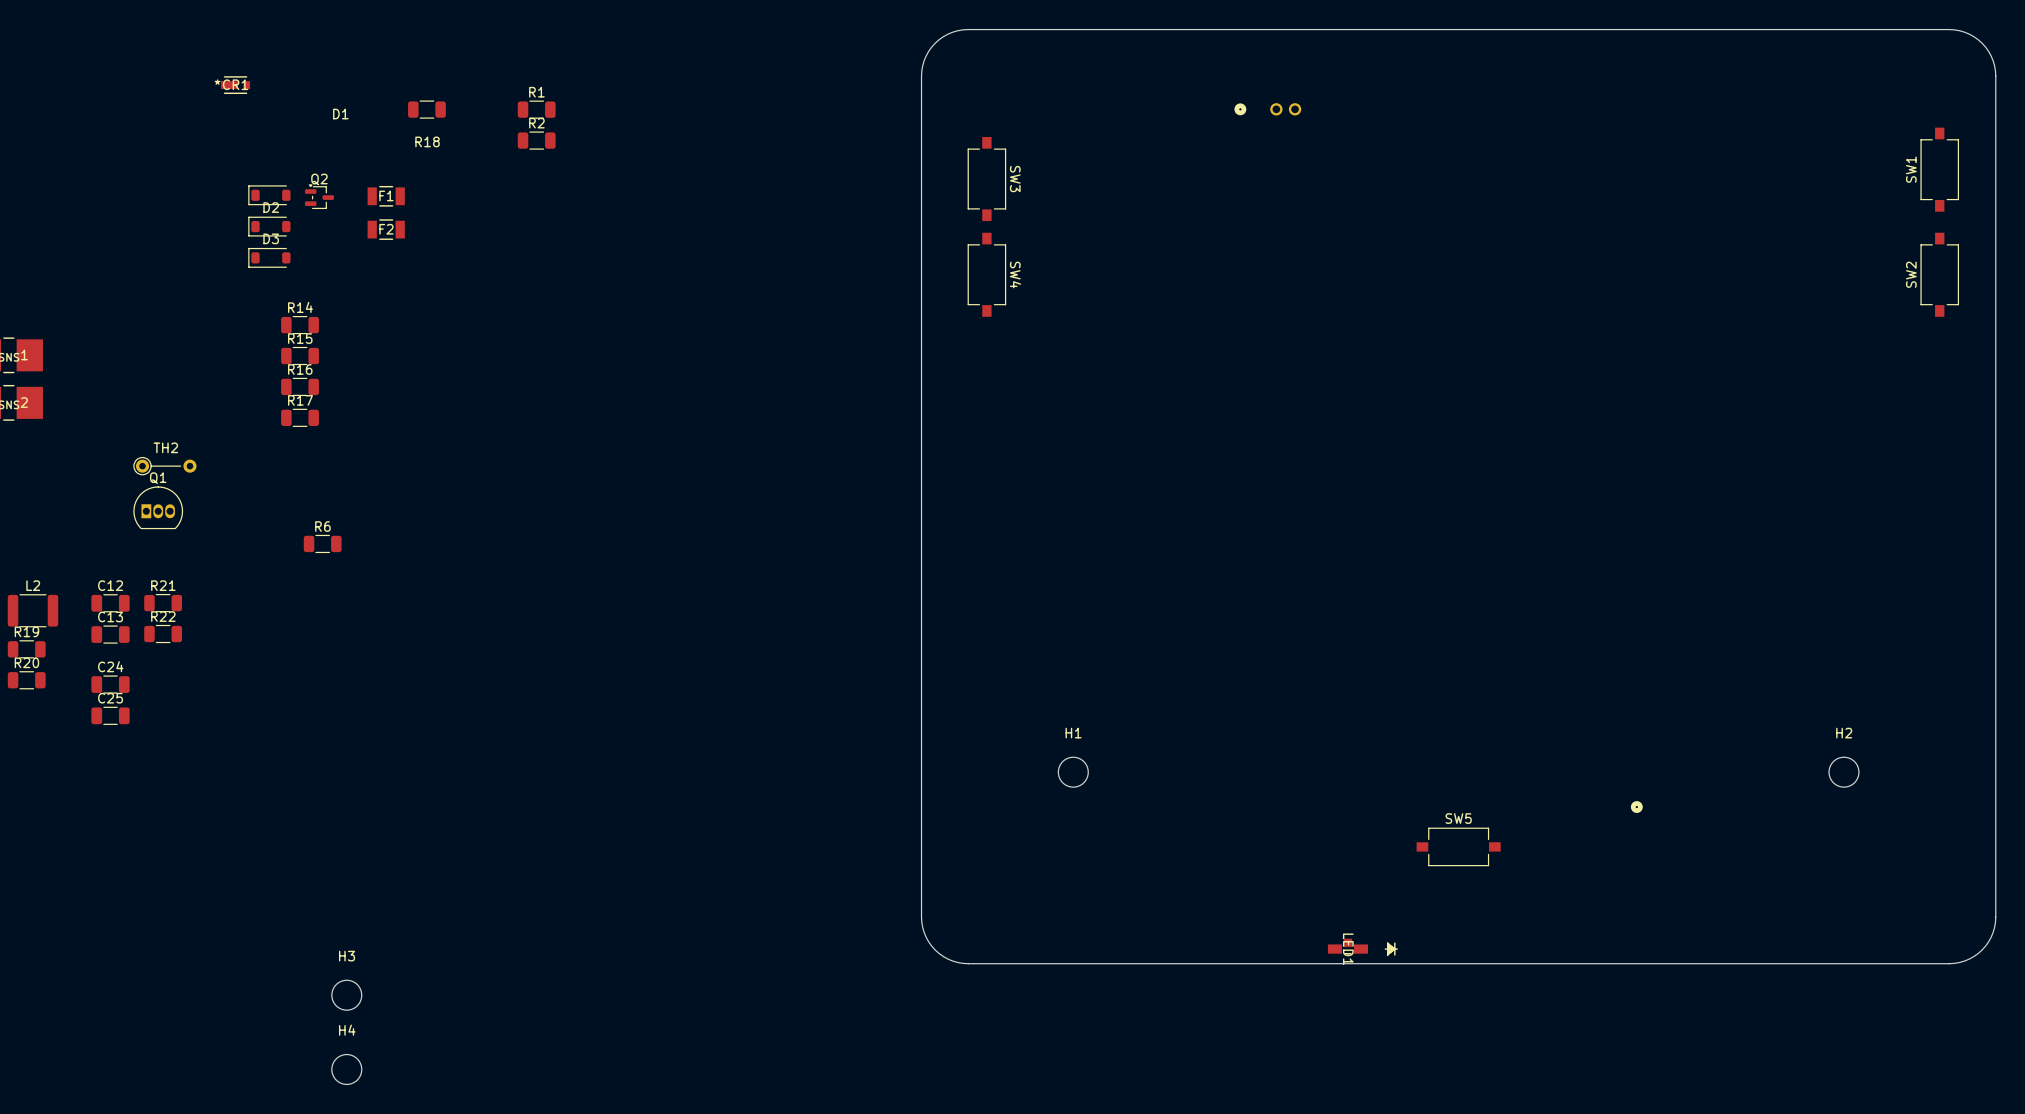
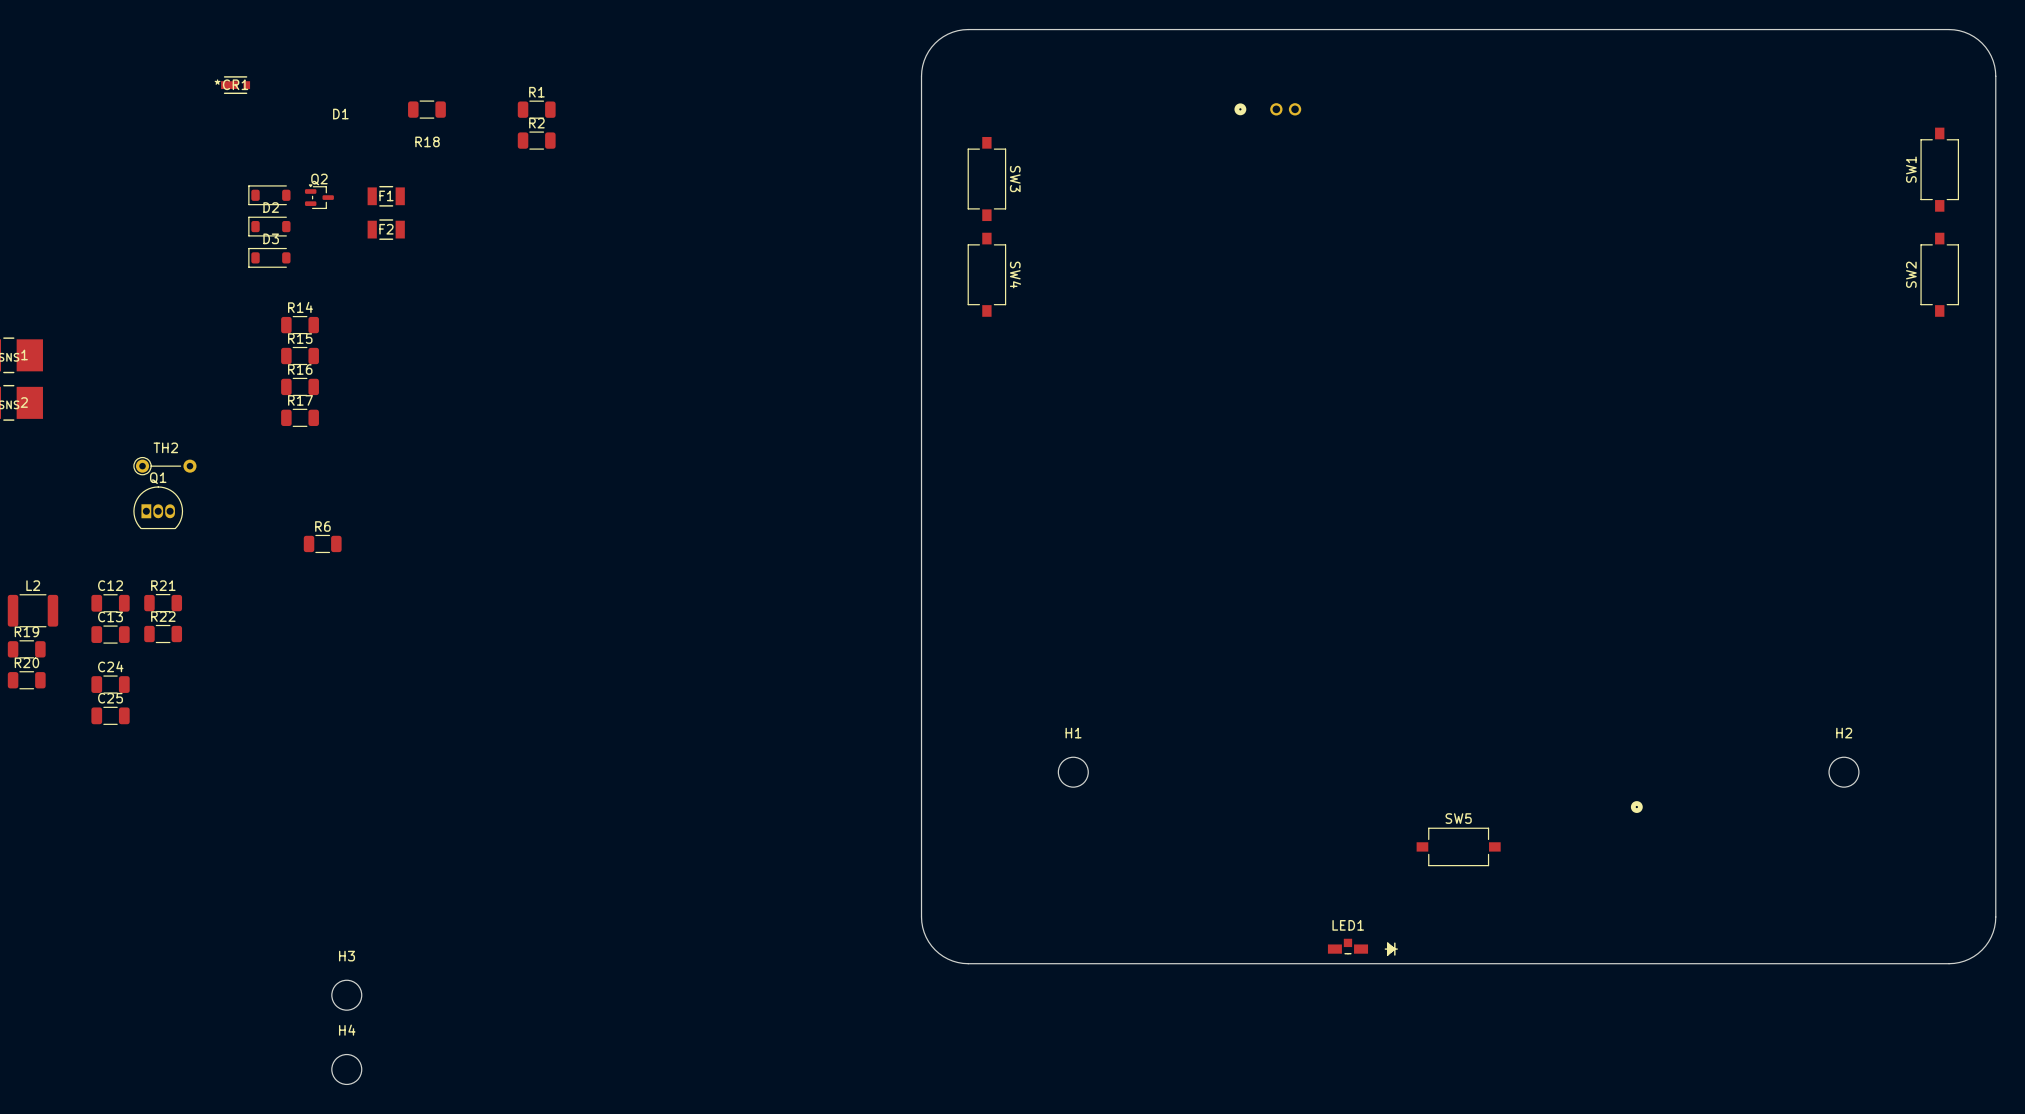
LED1 name rotation: 0° (1348, 949) -> 90° counterclockwise (1348, 925)

